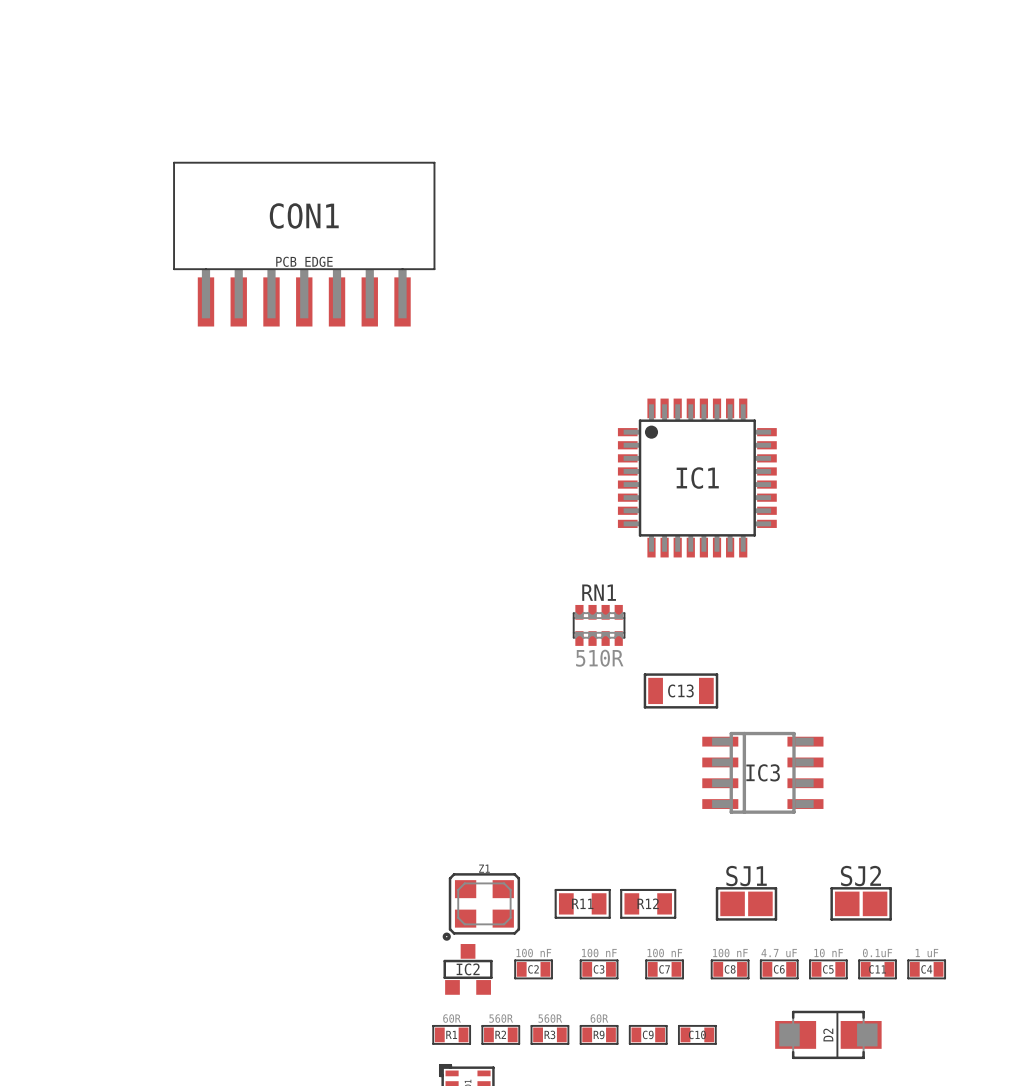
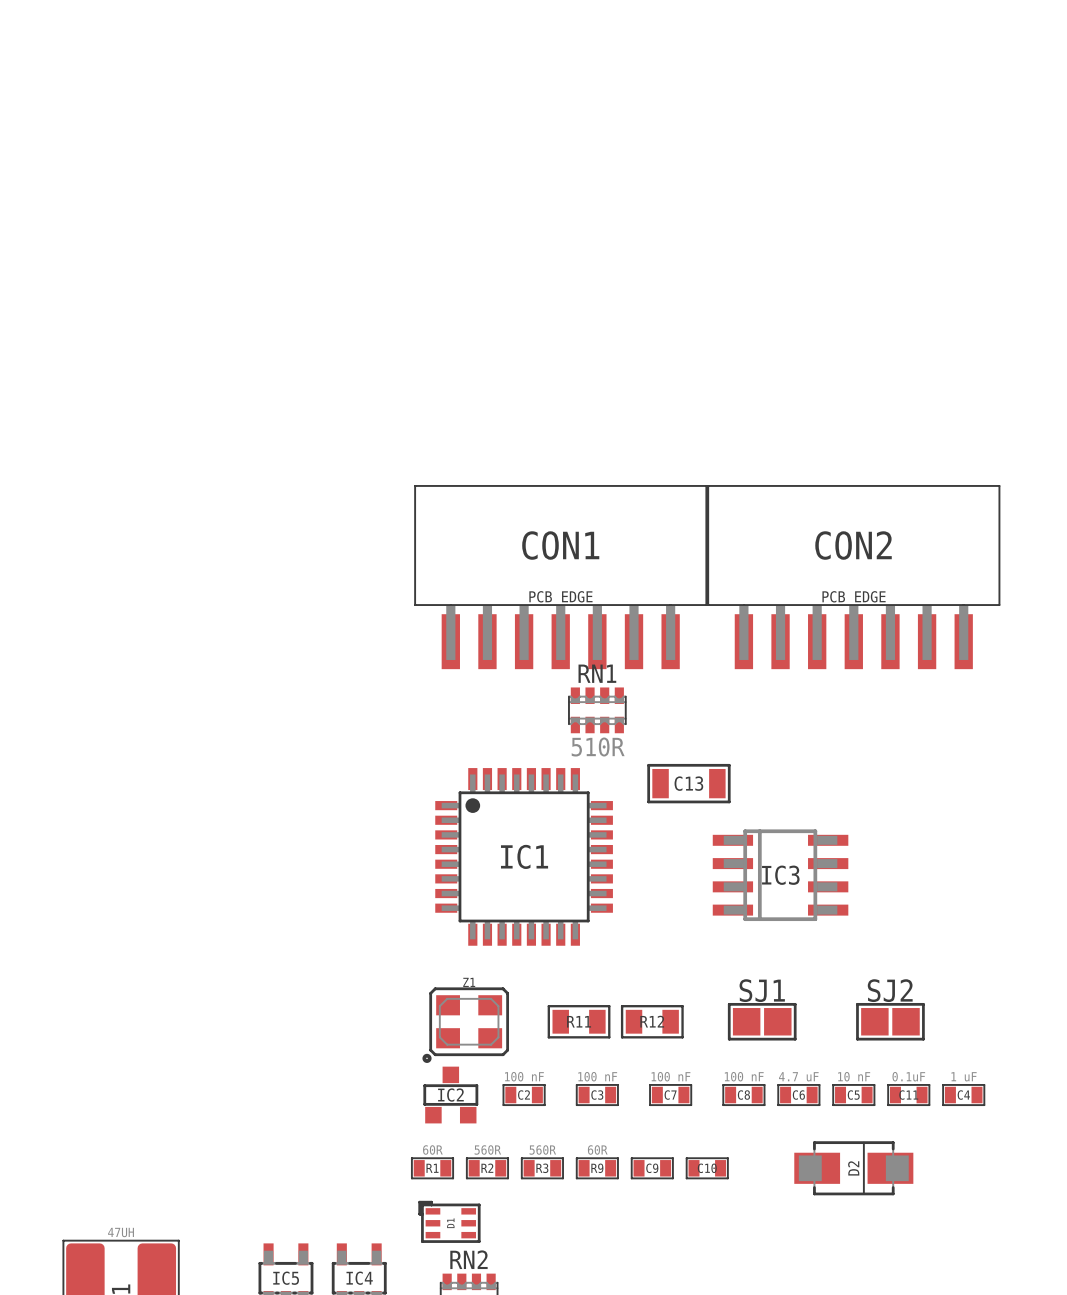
CON1 position: (304, 244) -> (560, 577)
IC1 position: (697, 478) -> (524, 856)
CON2: none -> (853, 577)

